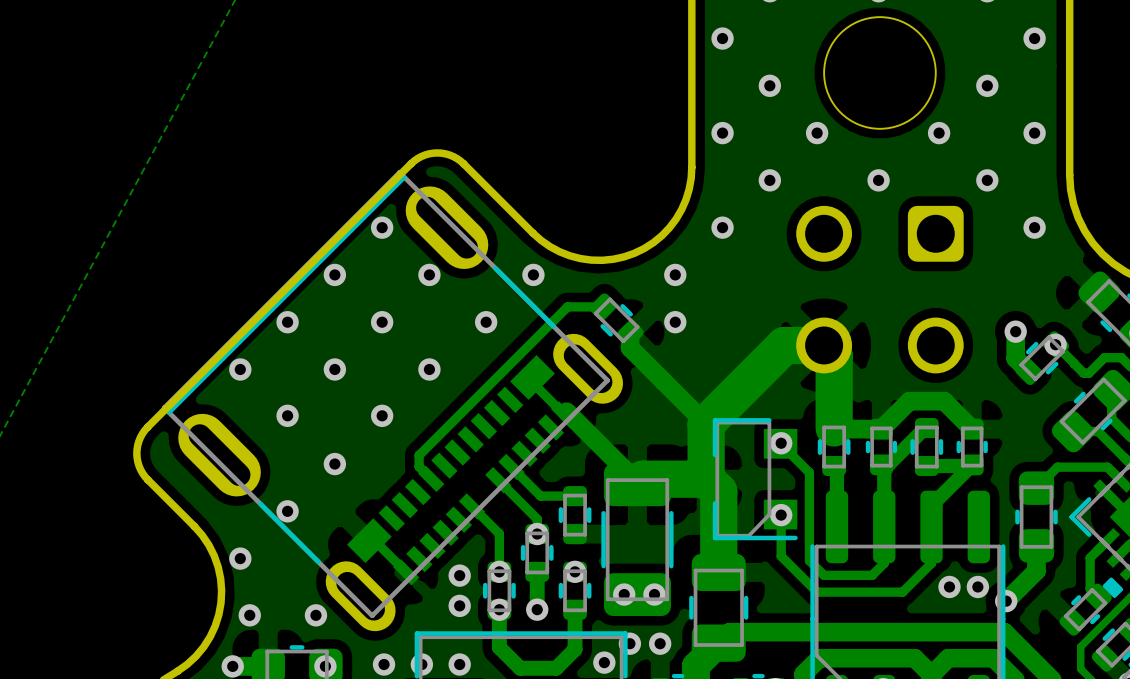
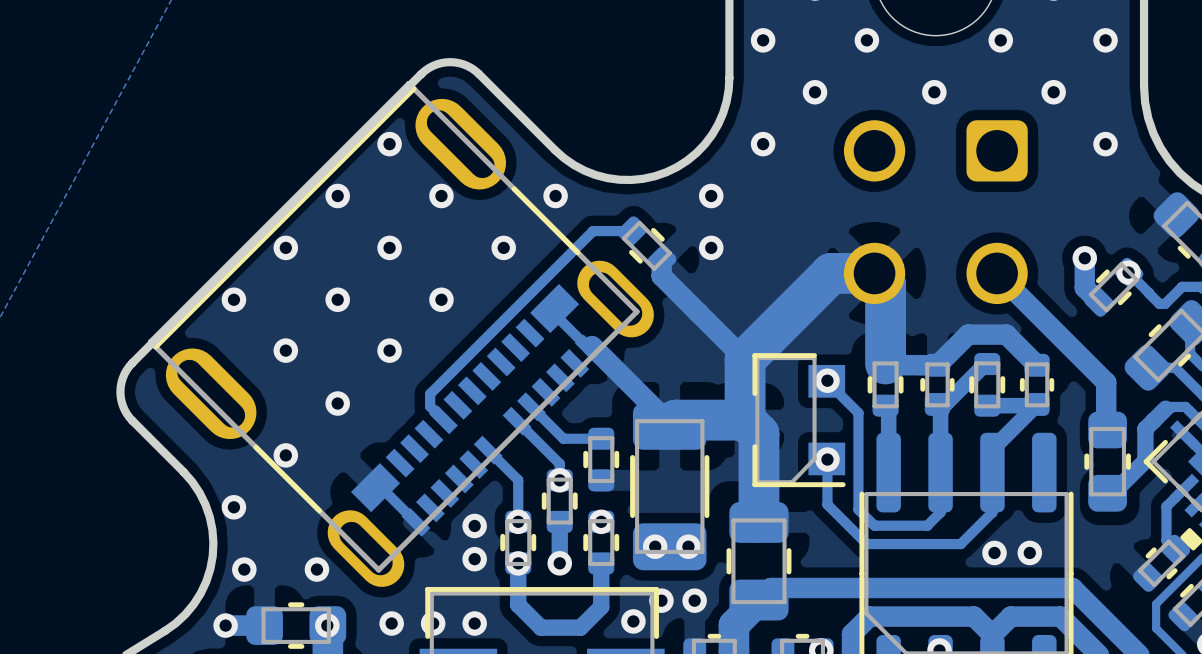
track: none -> (997, 273) (1106, 382) (1106, 429) (1109, 433)
track: (1094, 467) (1057, 467) (1036, 488) -> (1171, 406) (1165, 408) (1145, 428) (1145, 460) (1109, 496)
track: (1038, 544) (1036, 570) (1006, 601) -> none
via: (949, 586) -> none
via: (977, 586) -> none
via: none -> (994, 552)
via: none -> (1029, 552)
via: (1006, 601) -> none

